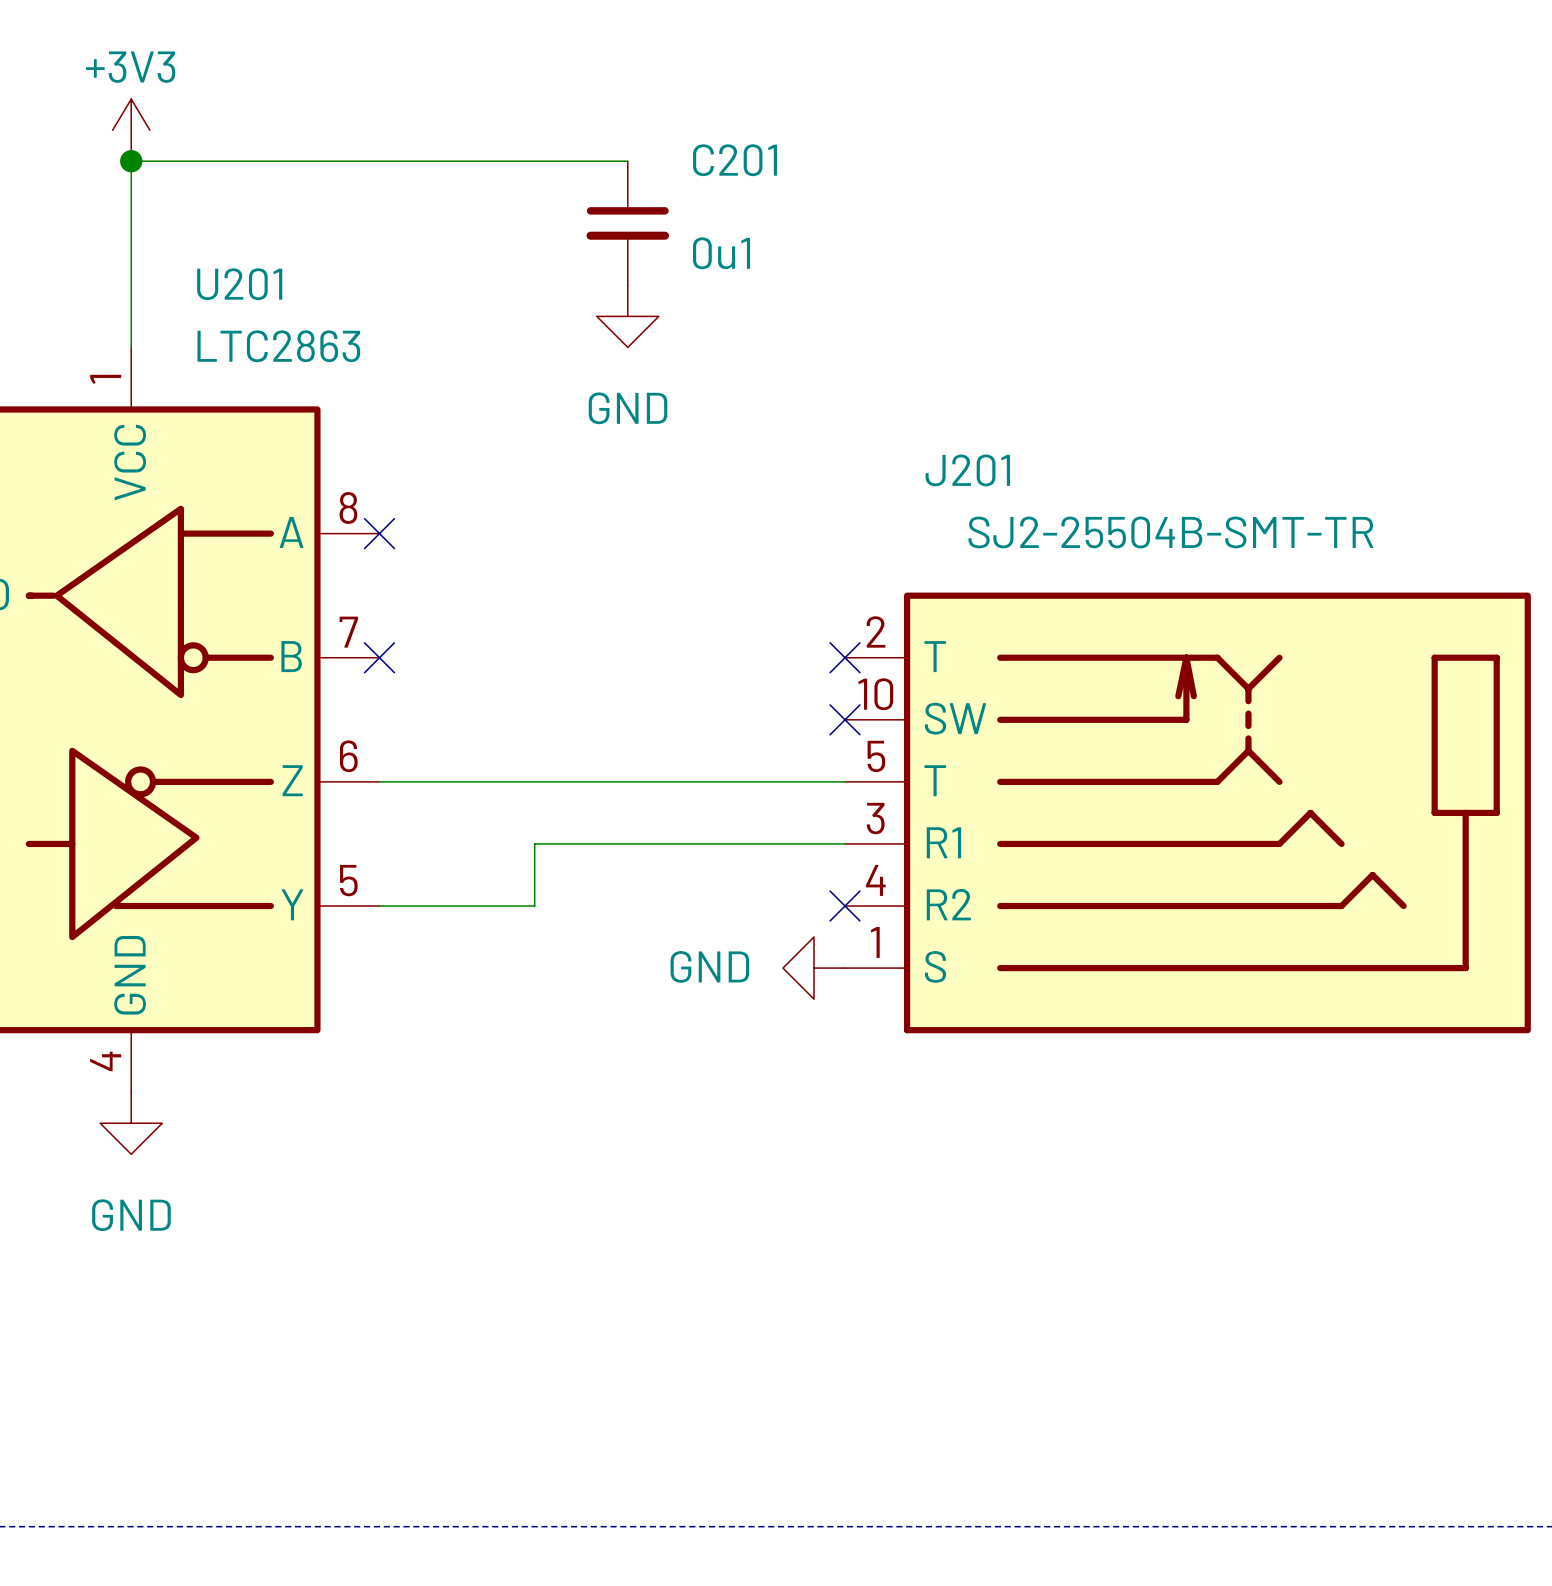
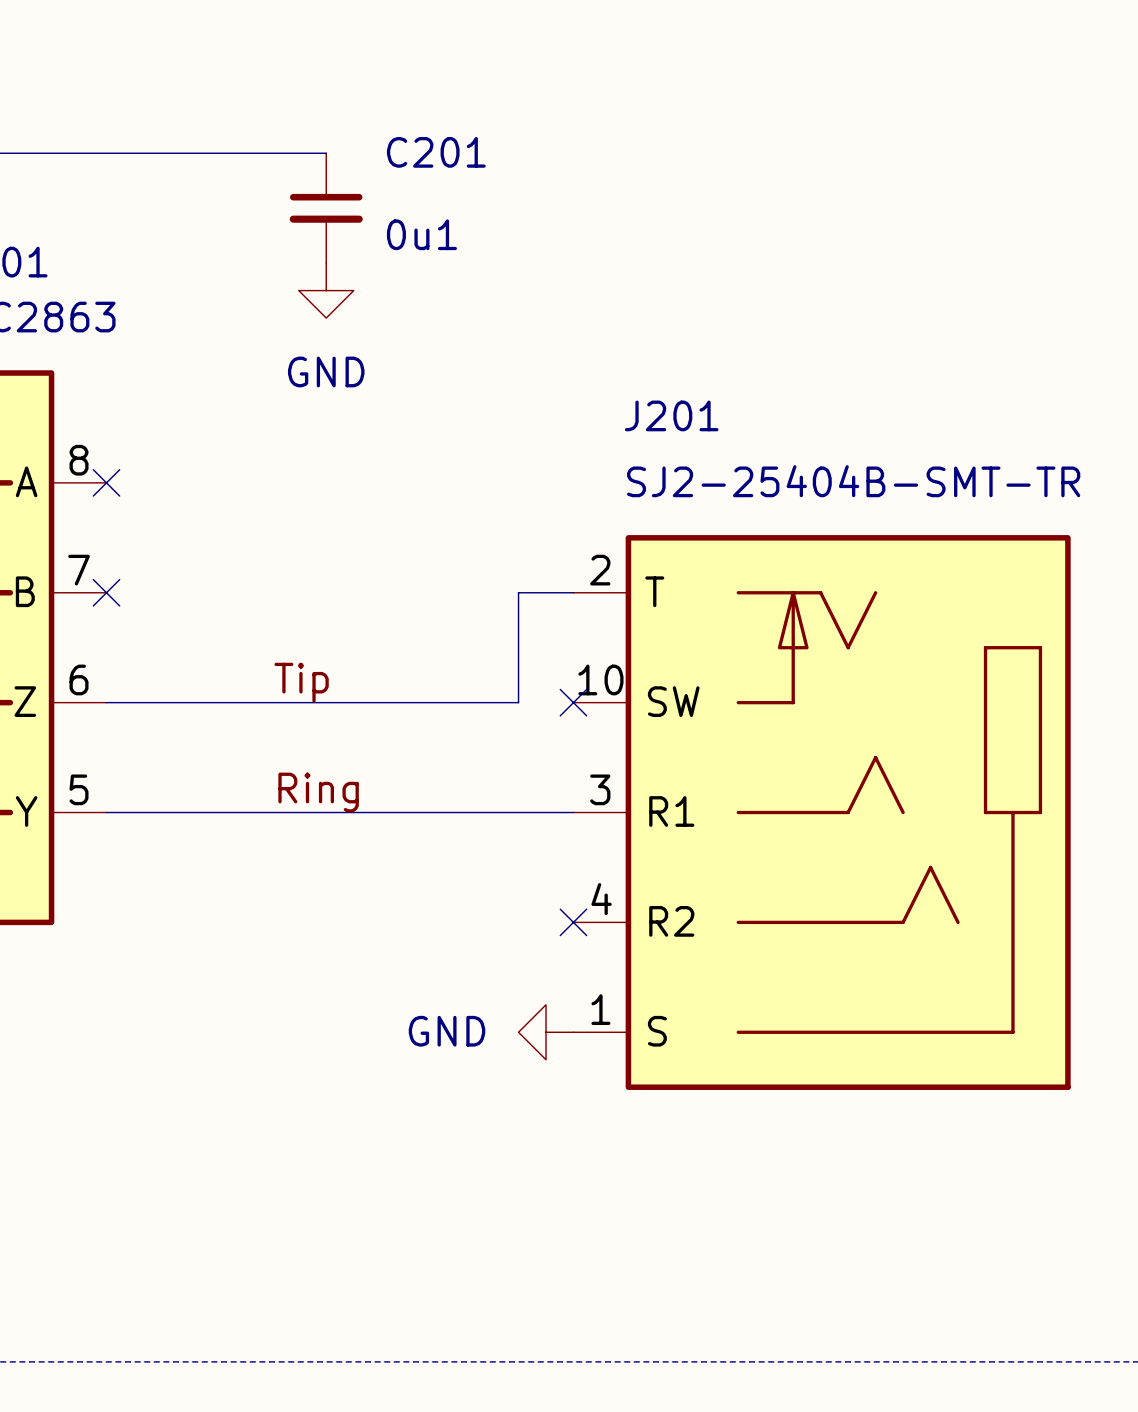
J201 name position: J201 (967, 470) -> J201 (671, 415)
J201 value: SJ2-25504B-SMT-TR (1170, 532) -> SJ2-25404B-SMT-TR (853, 481)
J201 symbol: [845, 592, 1531, 1034] -> [573, 535, 1071, 1090]
no-connect mark: (845, 657) -> none
wire: none -> (573, 592) (518, 592) (518, 702)
no-connect mark: (845, 719) -> none
label: none -> Tip (301, 682)
no-connect mark: none -> (573, 702)
wire: (845, 843) (534, 843) (534, 906) -> (573, 812) (243, 812)
label: none -> Ring (318, 792)
no-connect mark: (845, 906) -> none
power symbol position: GND (813, 968) -> GND (546, 1032)
no-connect mark: none -> (573, 922)

